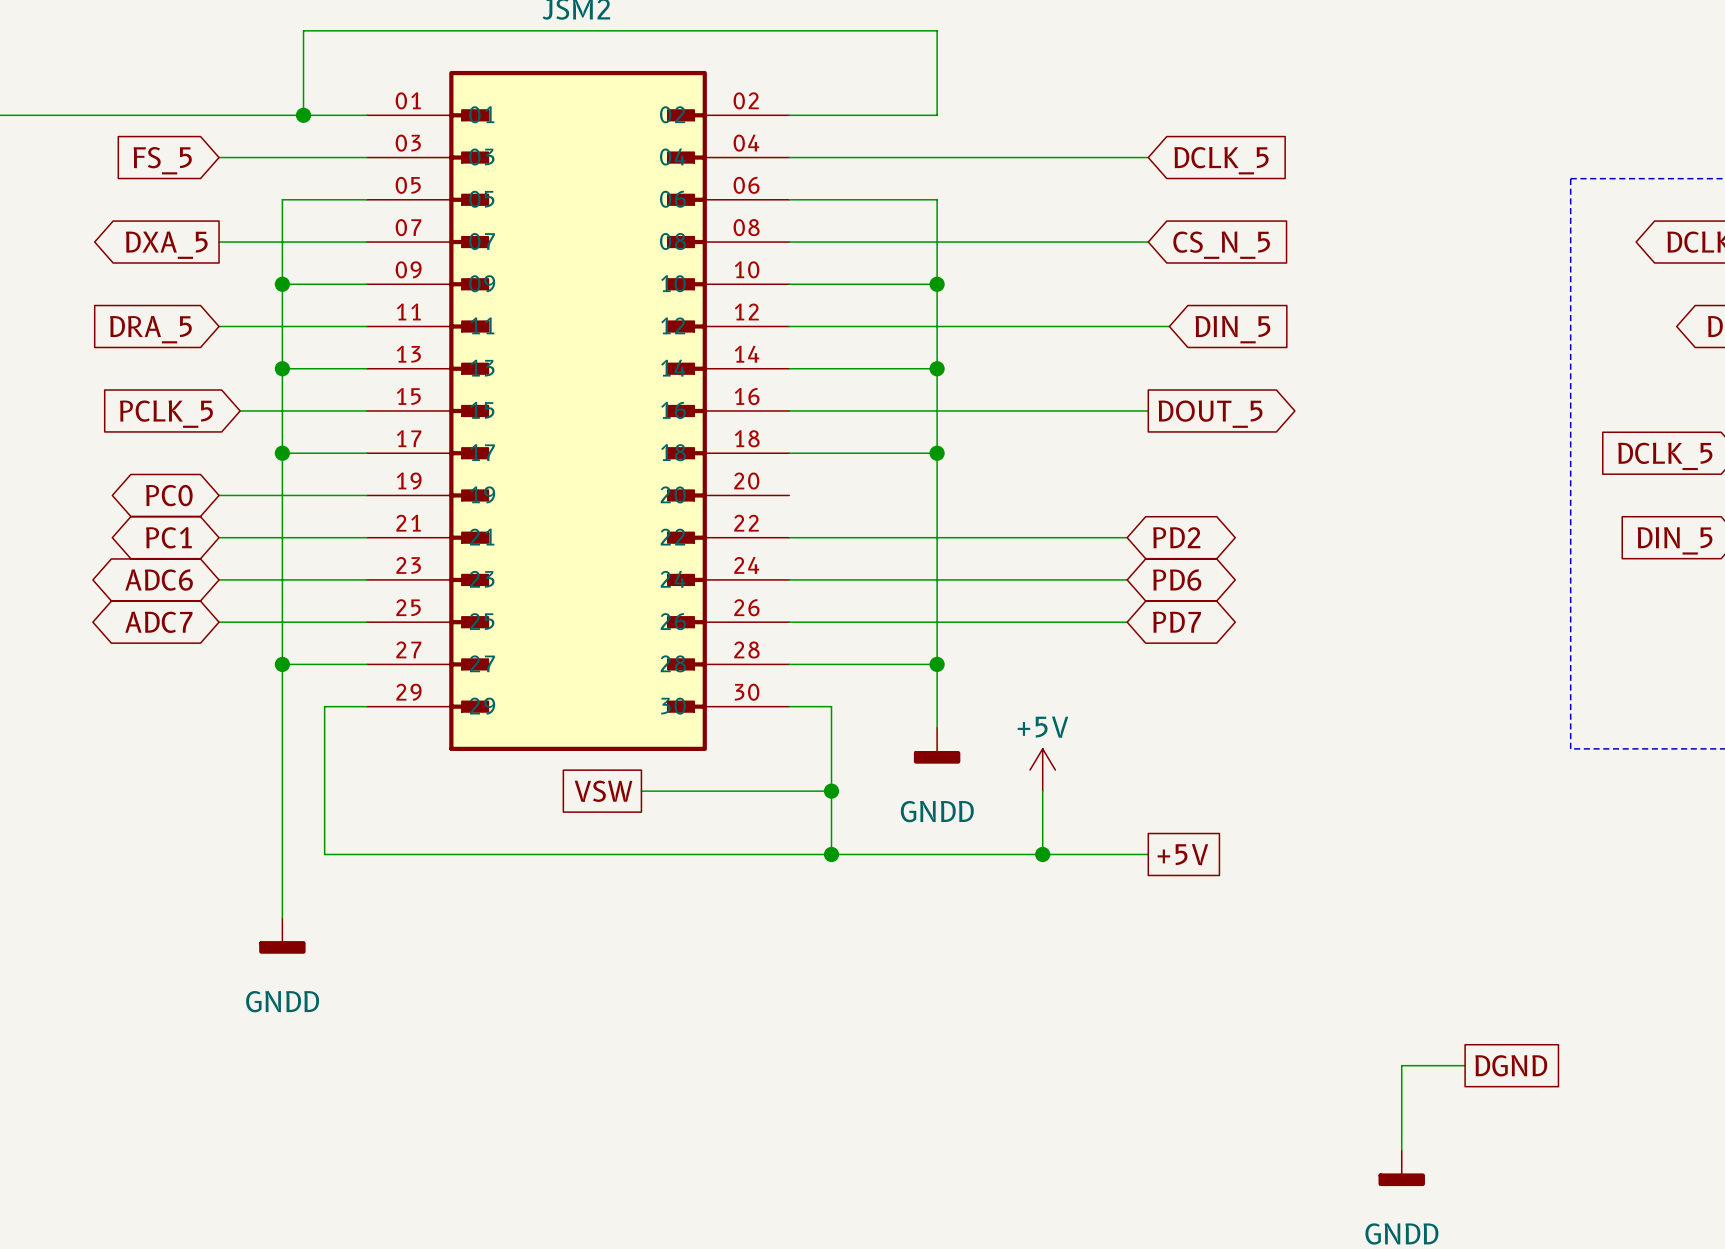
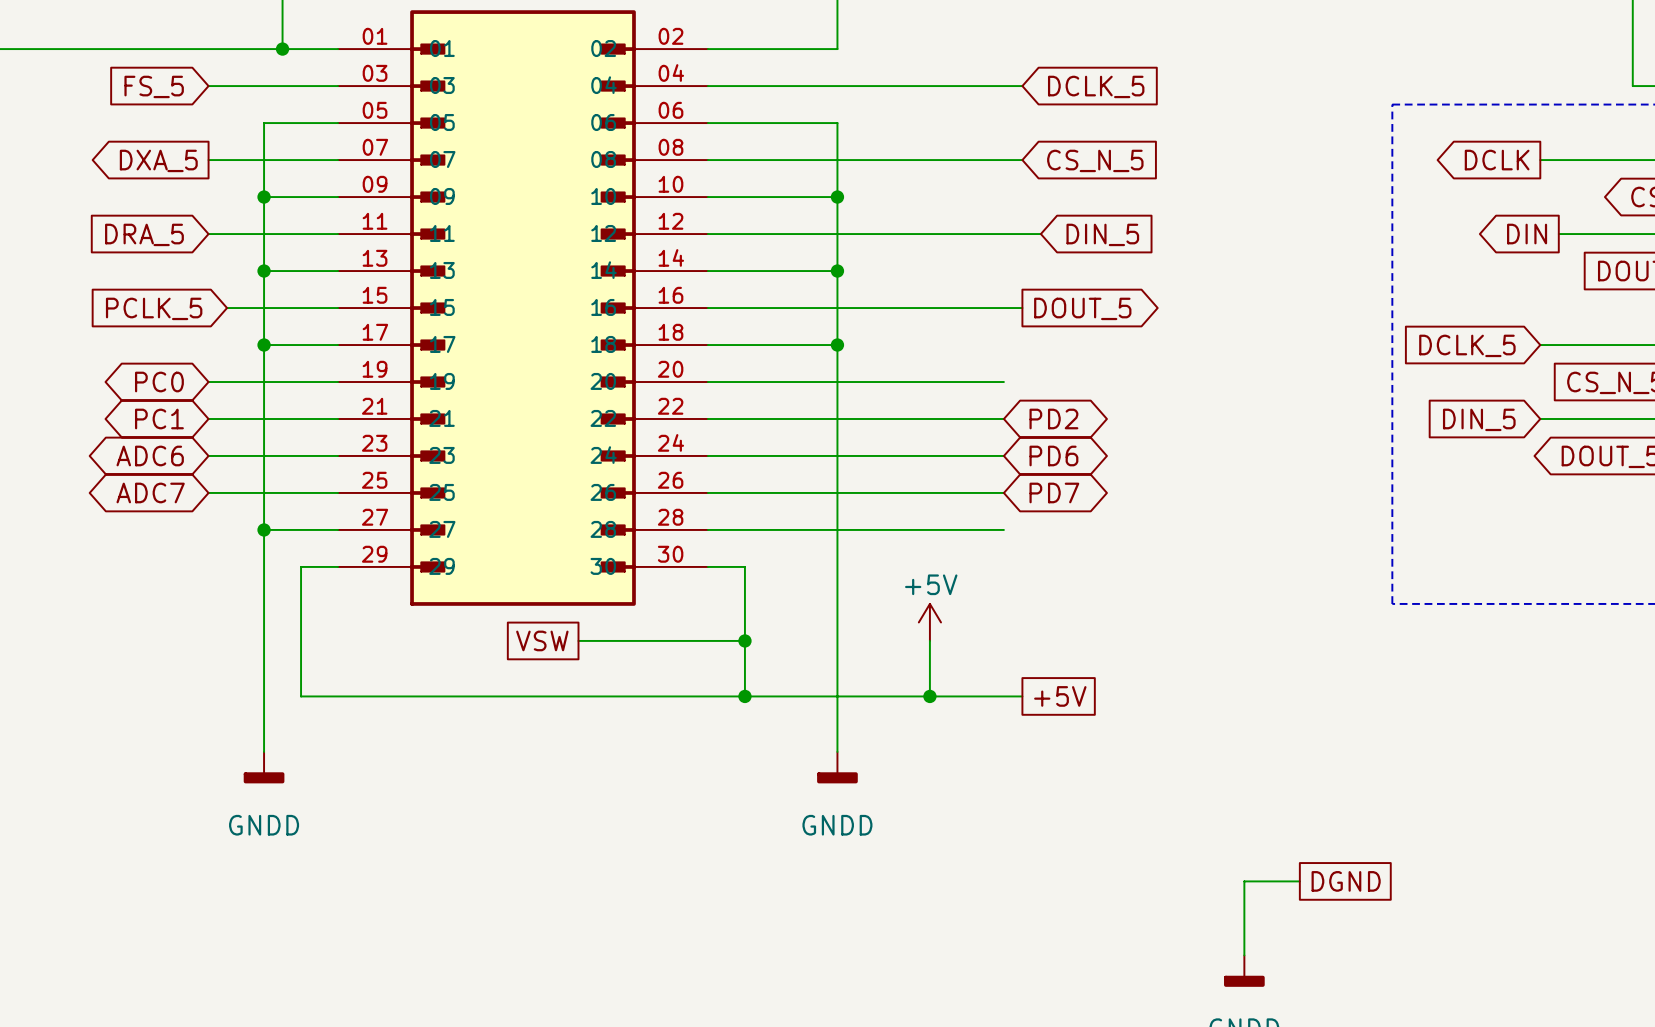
wire: none -> (707, 382) (1003, 382)
wire: none -> (837, 529) (1003, 529)
junction: (937, 664) -> none
wire: none -> (837, 585) (837, 751)
power symbol position: GNDD (937, 745) -> GNDD (837, 767)

